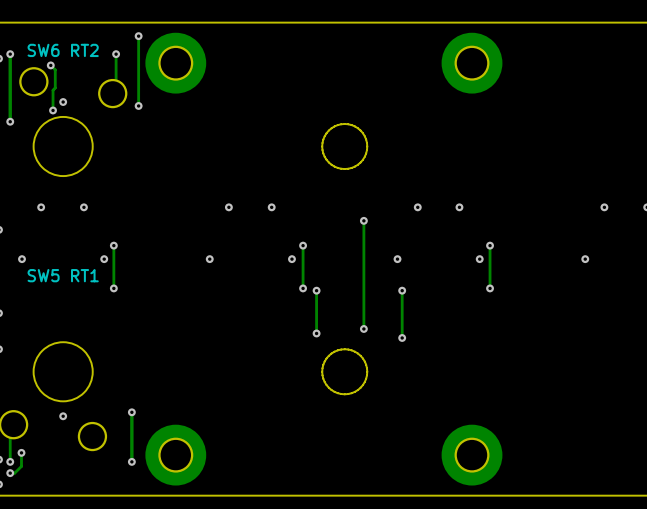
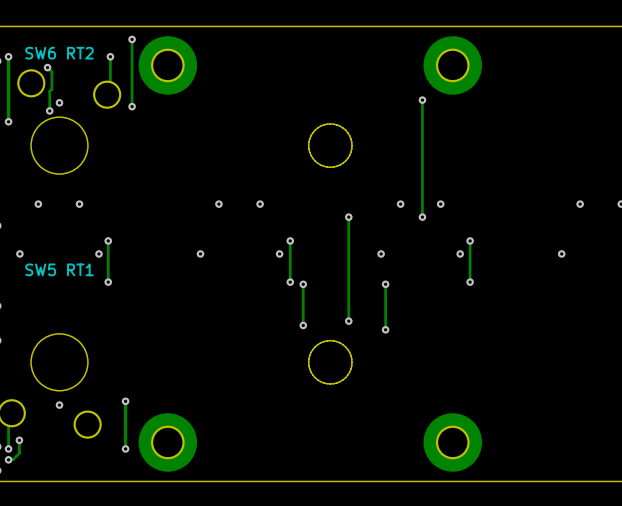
track: none -> (422, 100) (422, 217)
via: none -> (422, 100)
via: none -> (422, 217)

